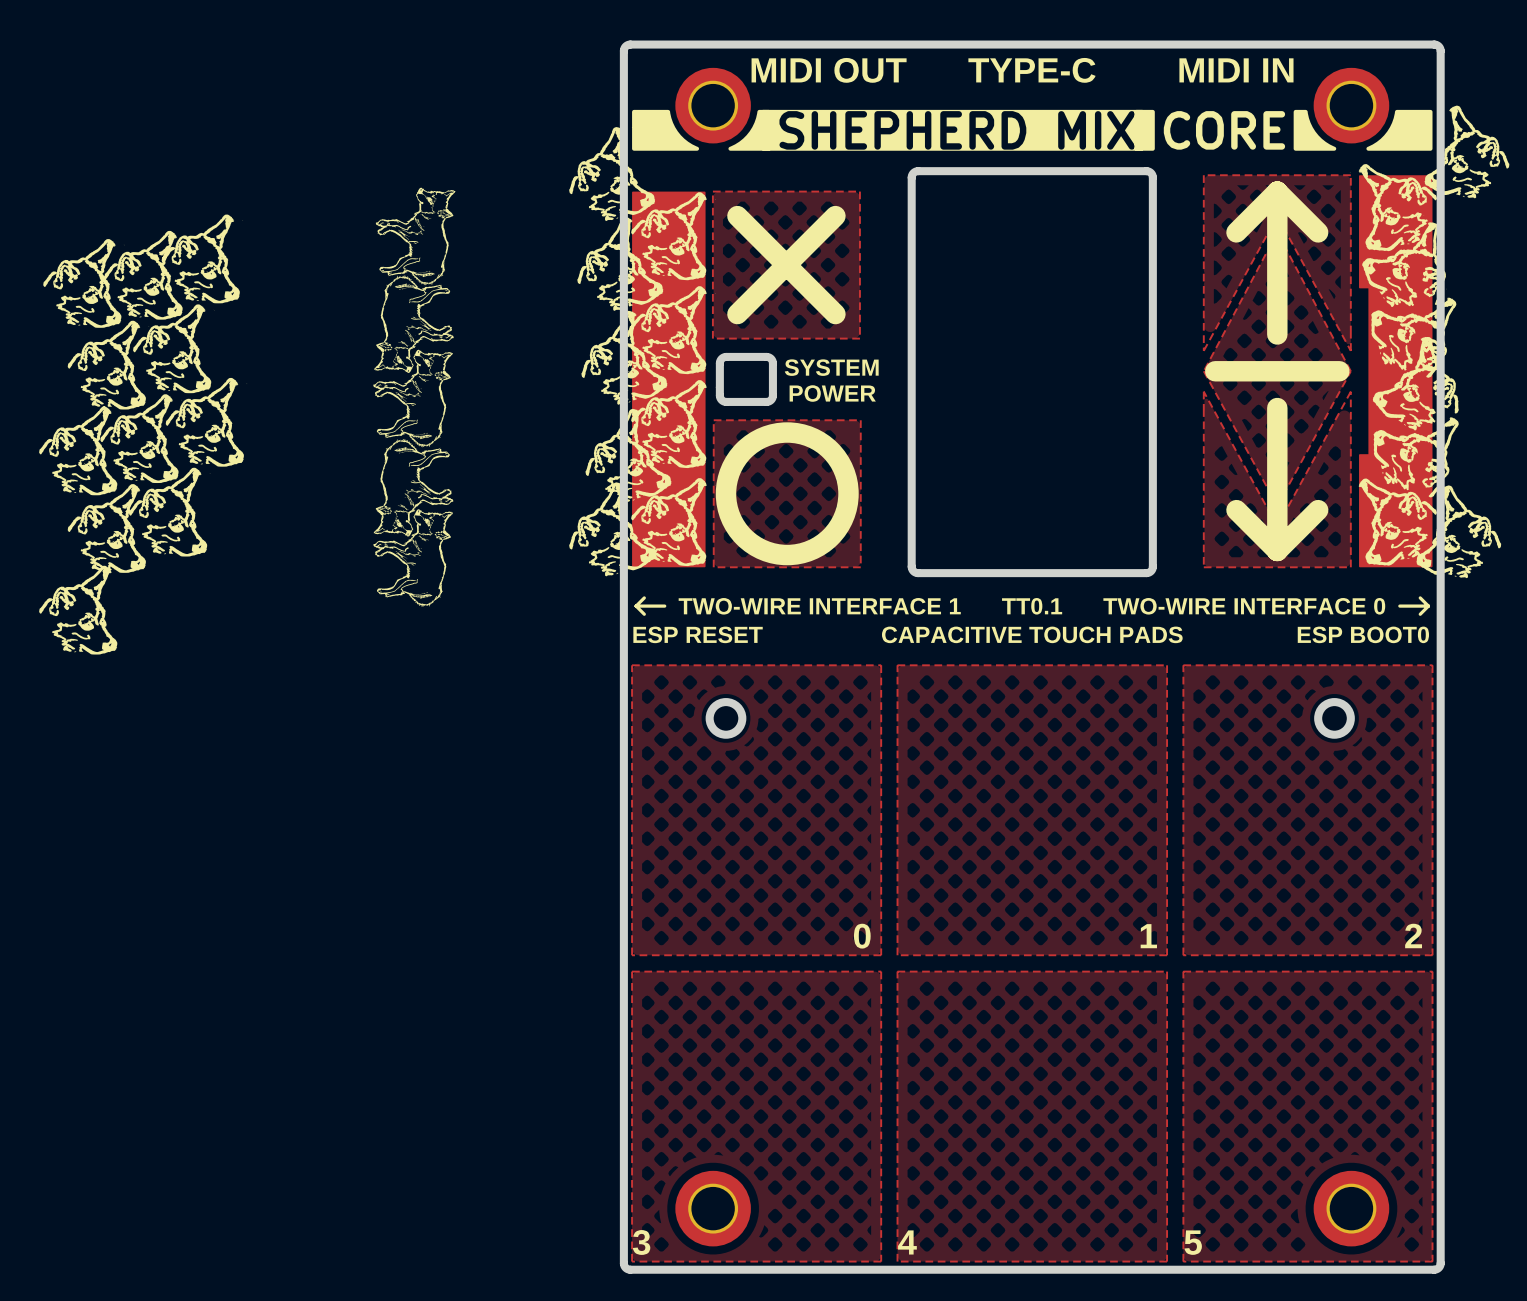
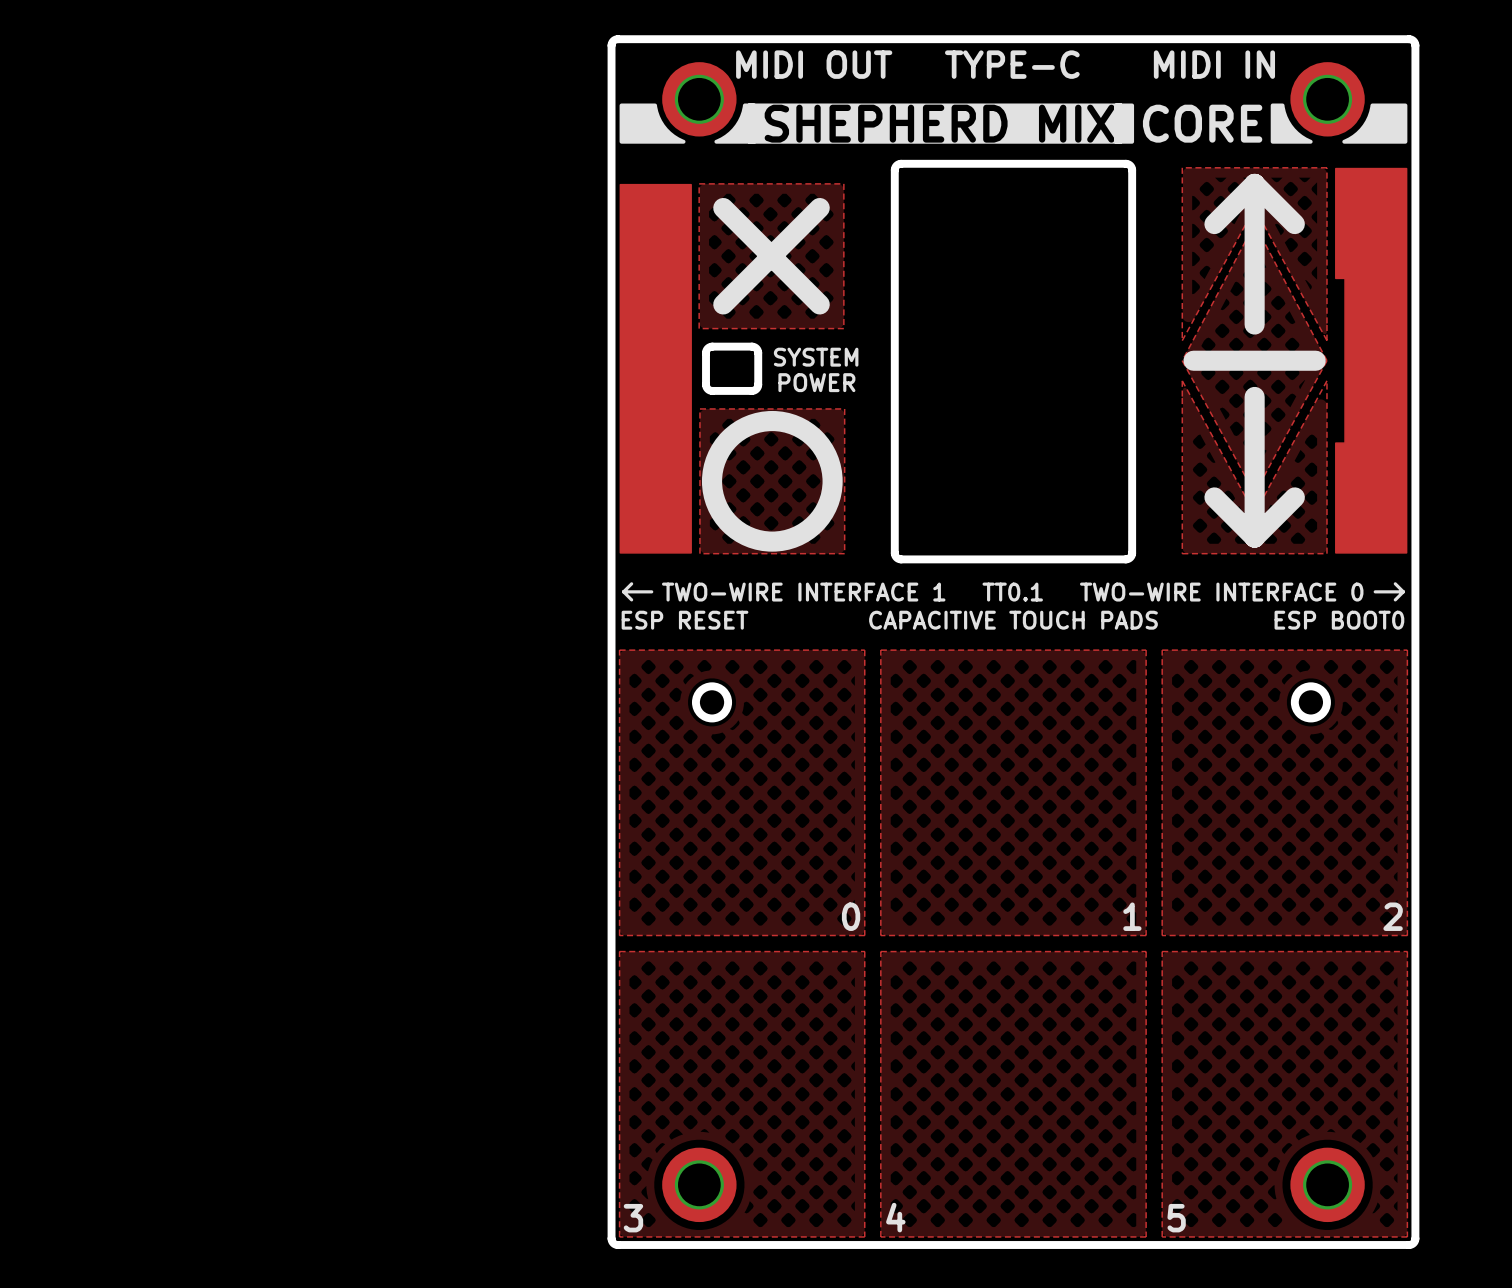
drawing: [1349, 105, 1510, 579] -> none
drawing: [569, 127, 716, 577] -> none
drawing: [373, 187, 456, 607] -> none
drawing: [39, 214, 248, 655] -> none

